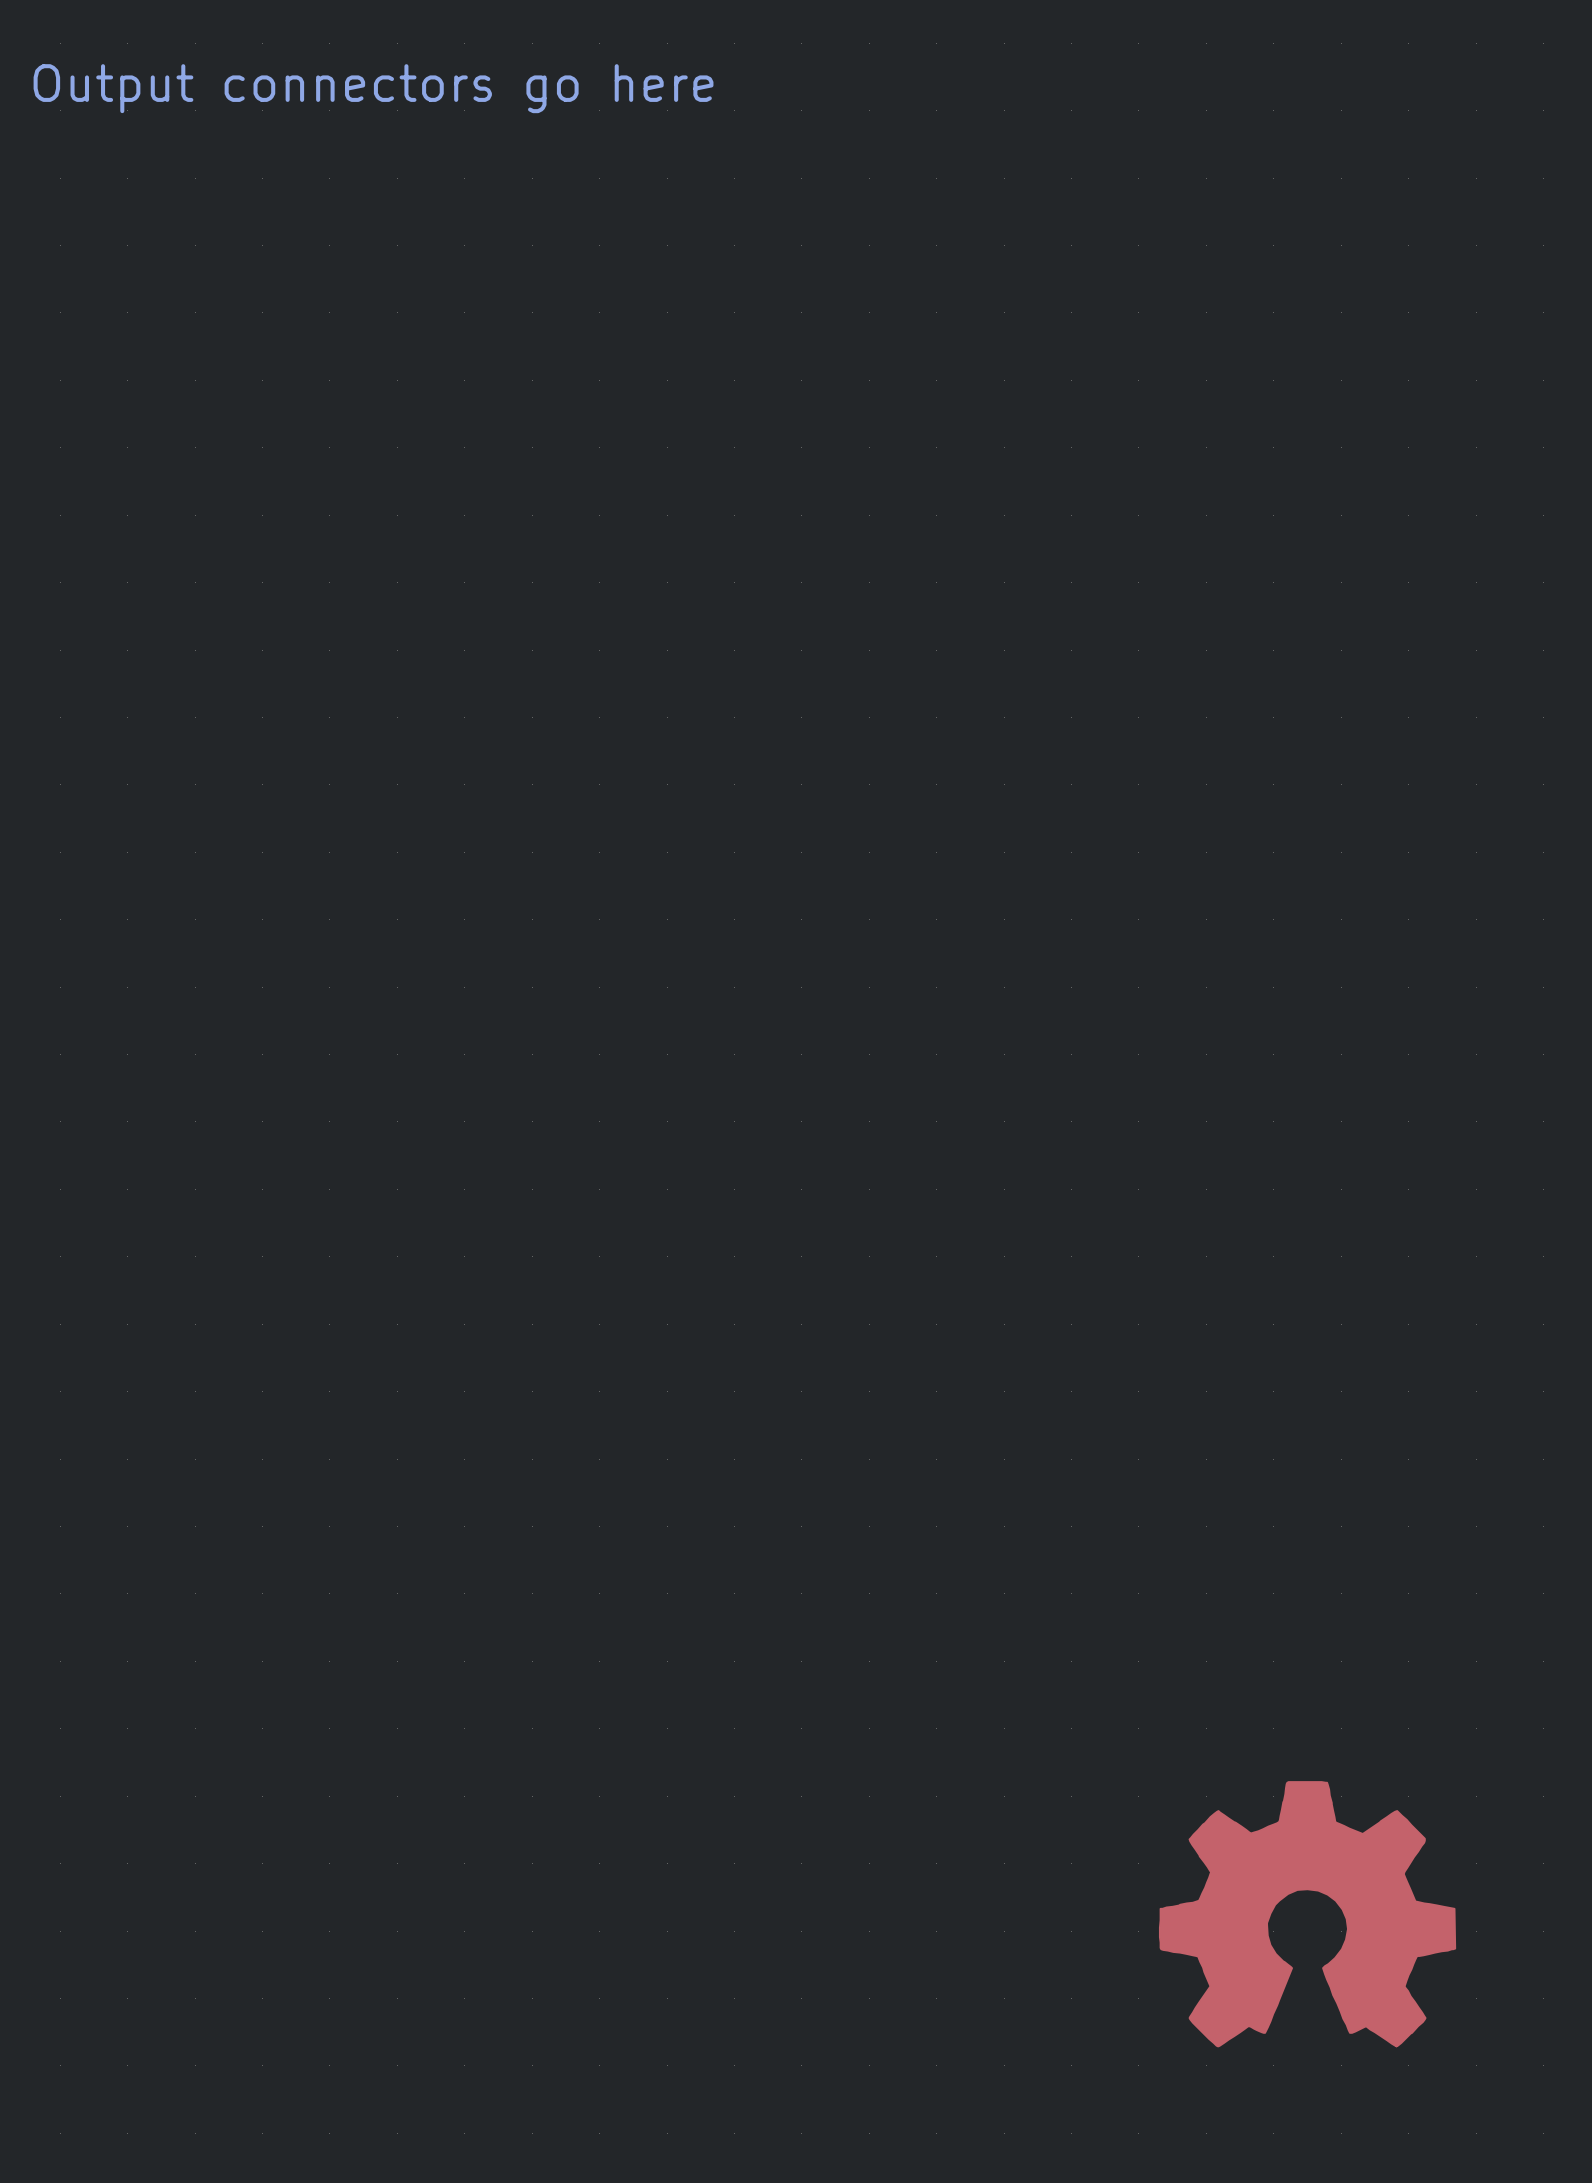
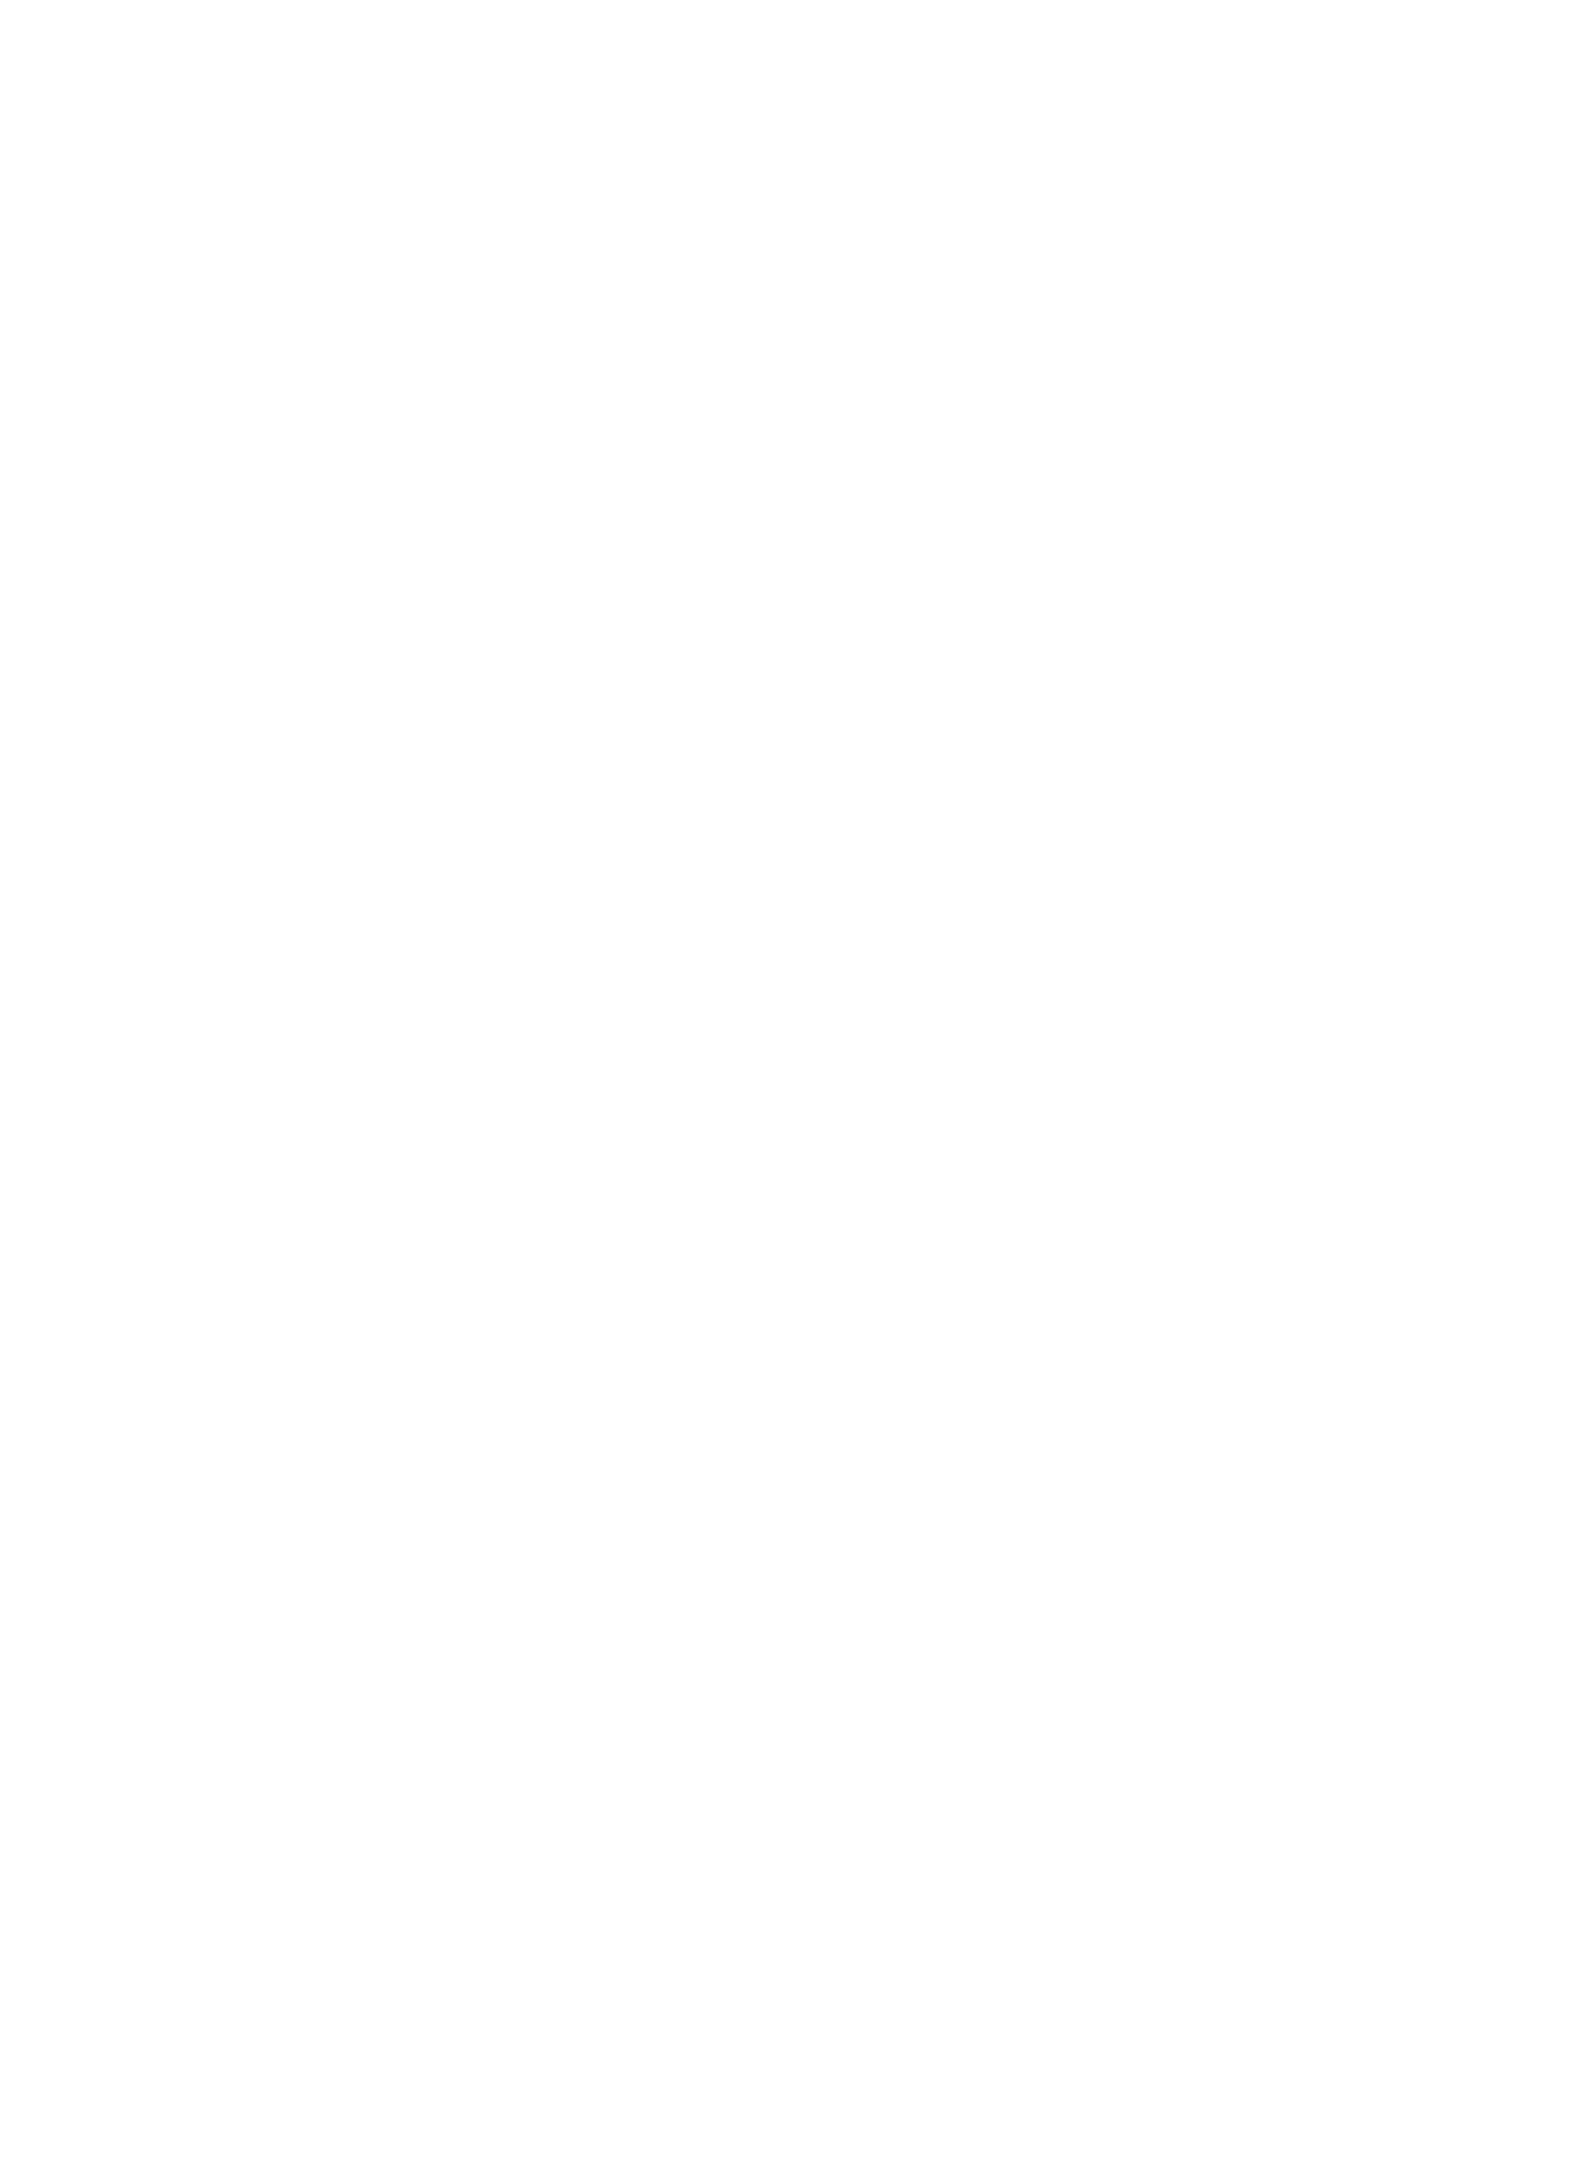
text: Output connectors go here (373, 88) -> none
part: (1307, 1914) -> none

